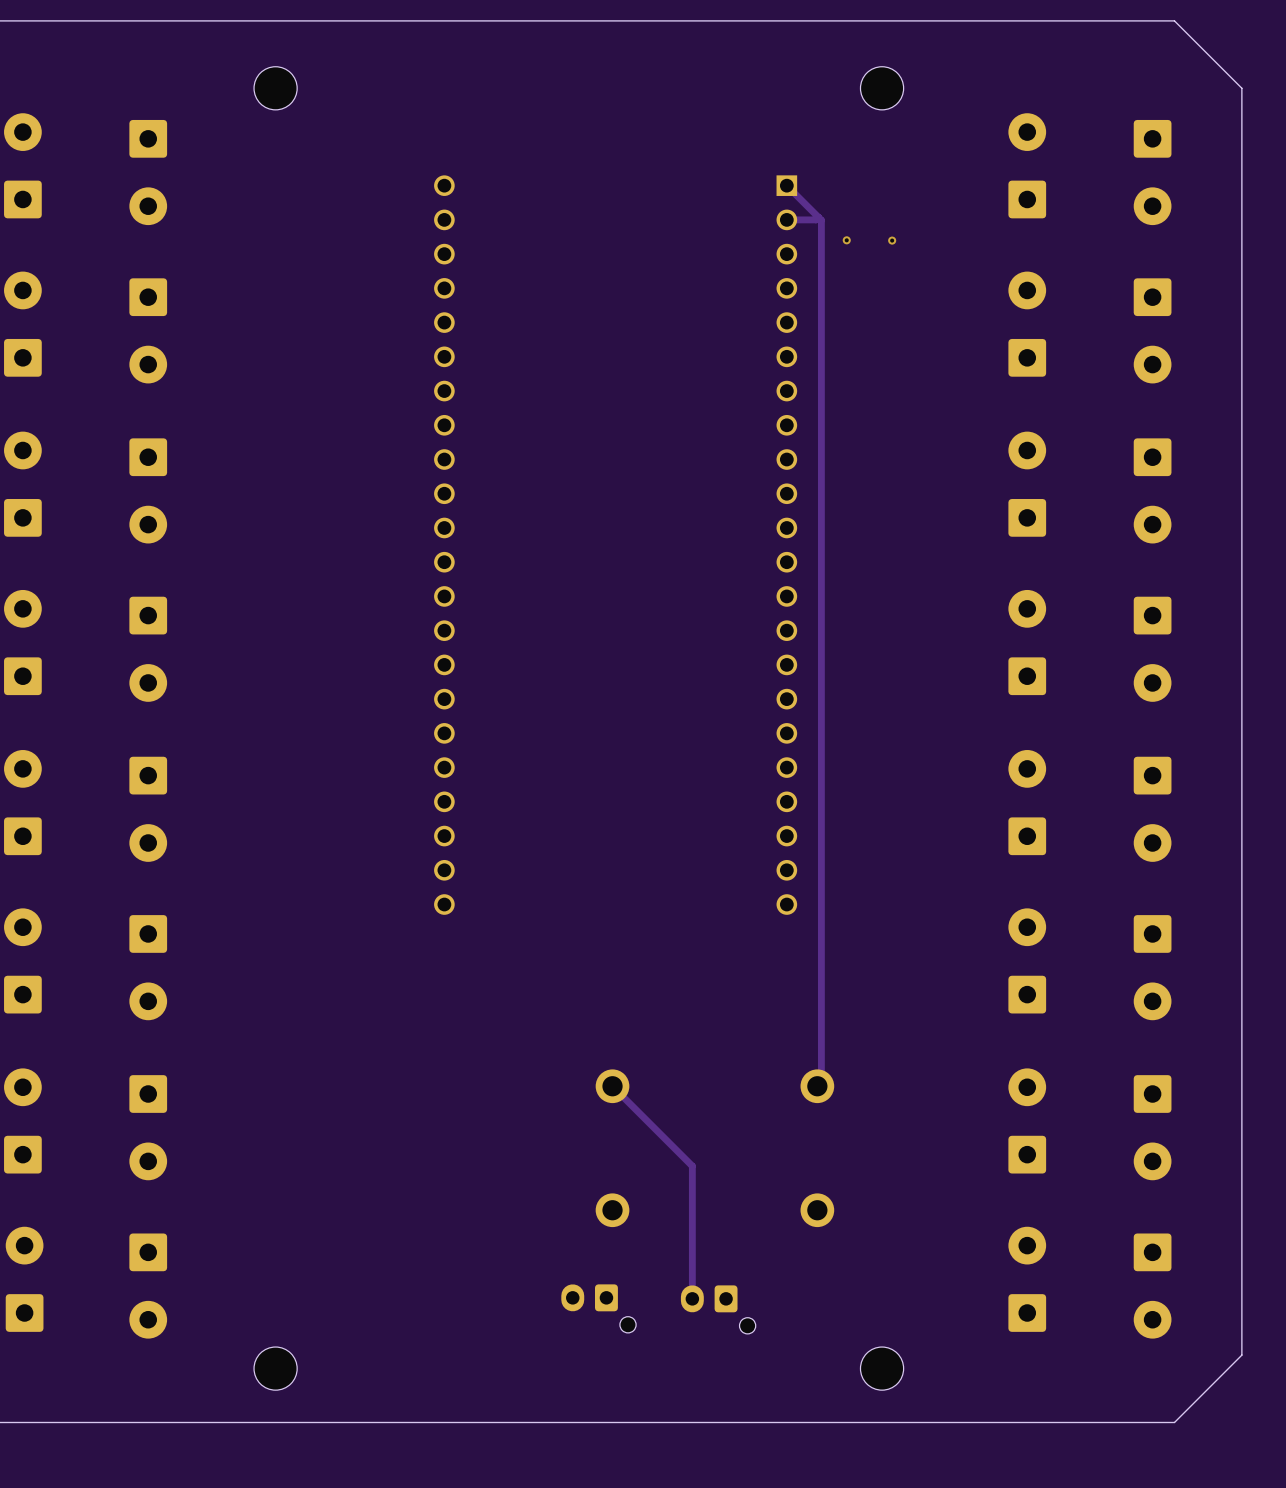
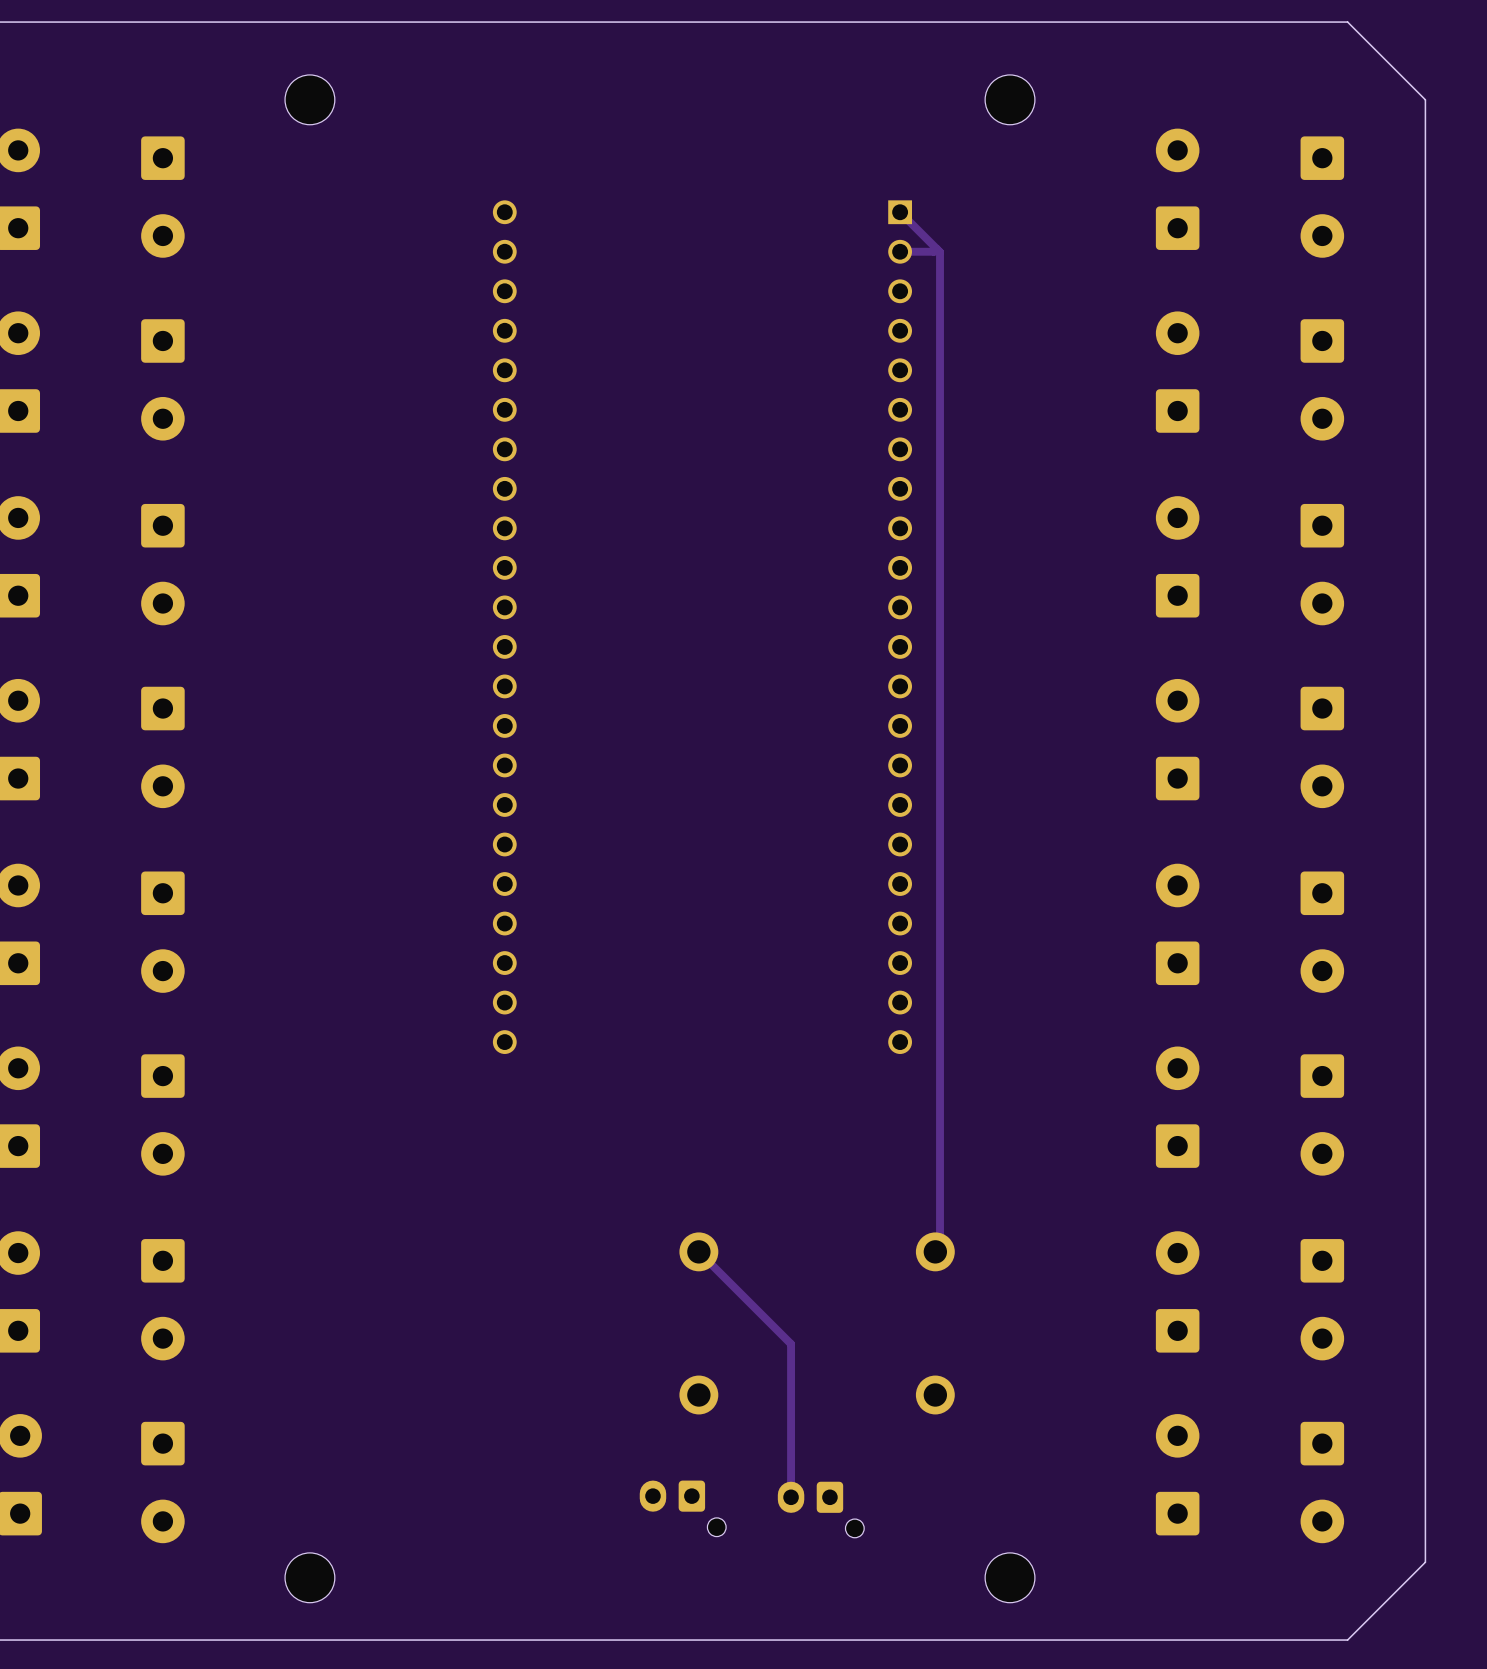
via: (846, 240) -> none
via: (892, 240) -> none

